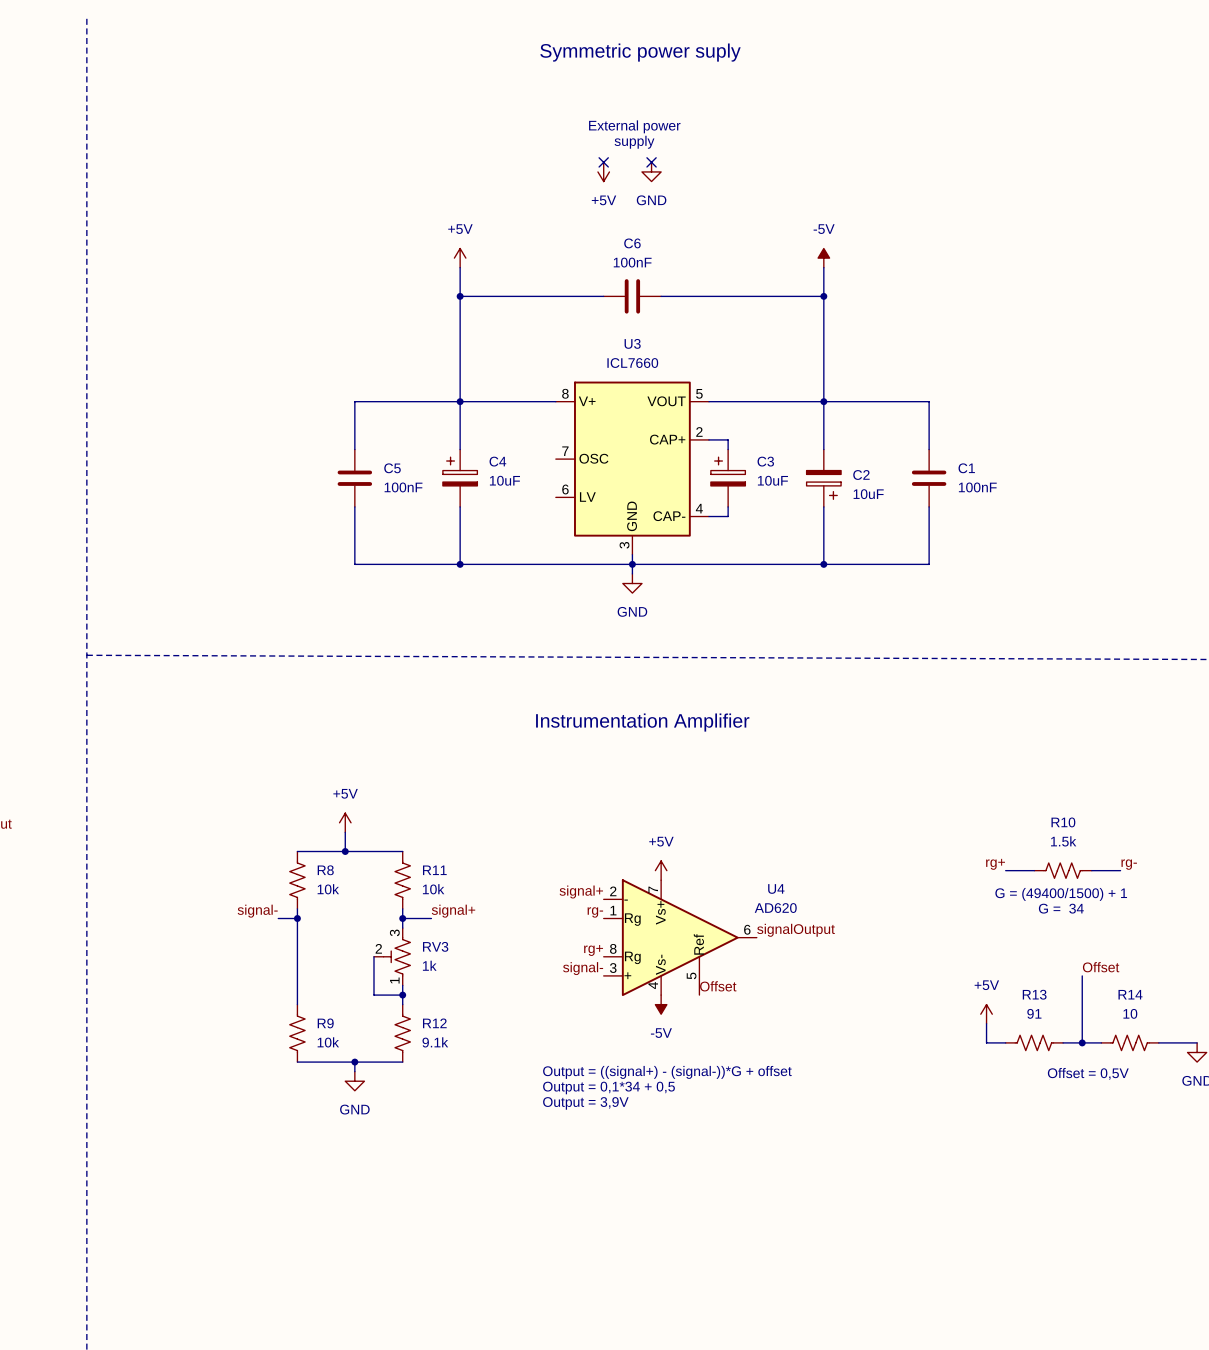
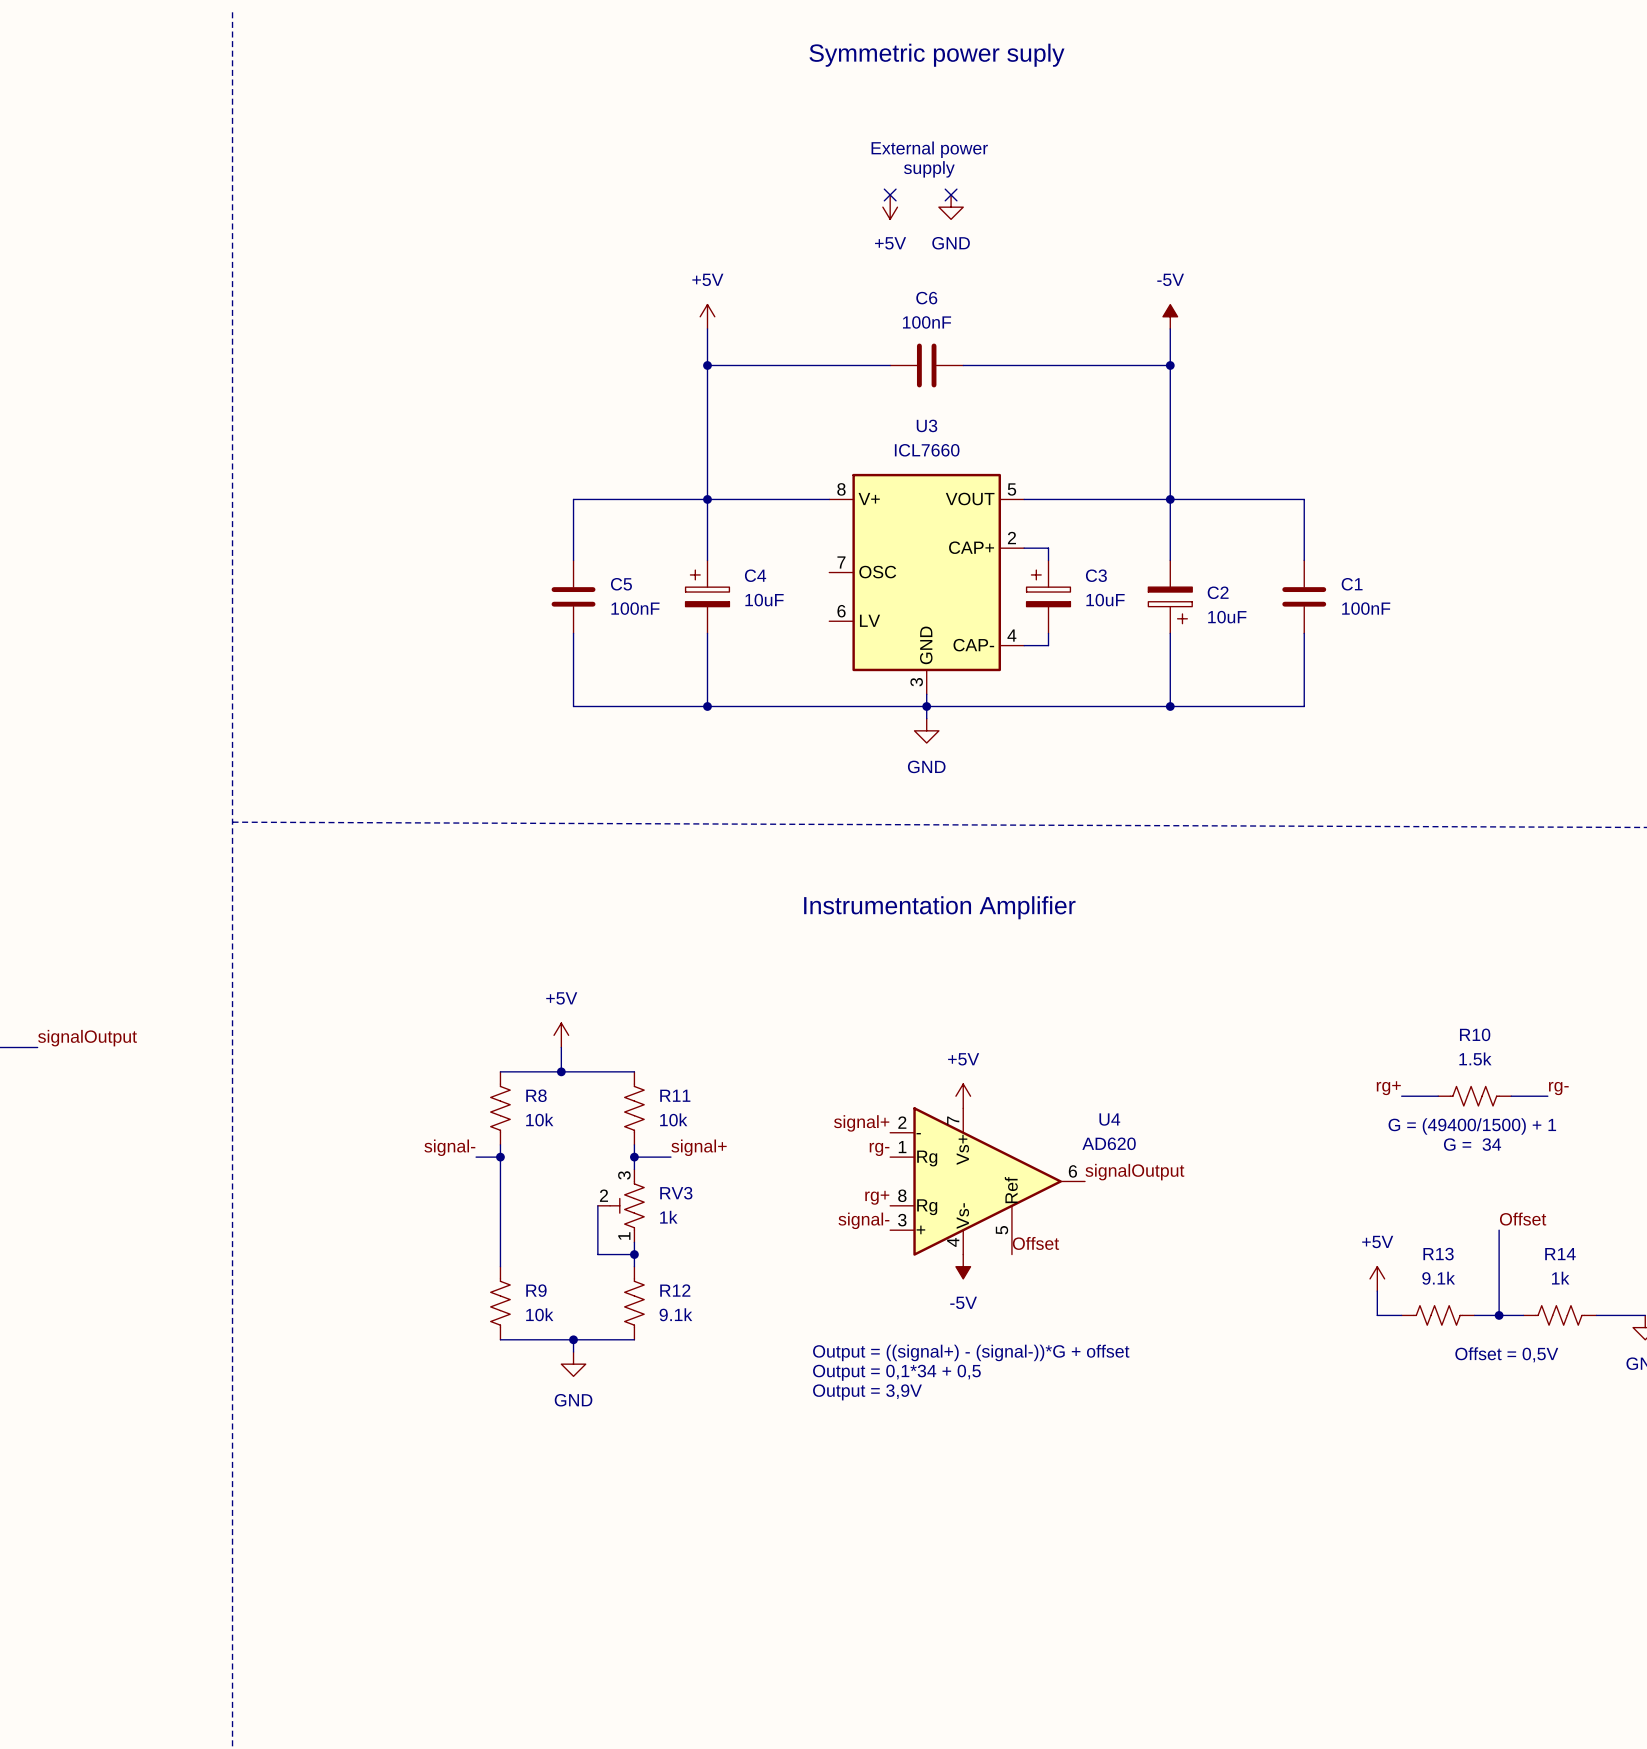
R13 value: 91 (1034, 1013) -> 9.1k (1438, 1278)
R14 value: 10 (1130, 1013) -> 1k (1560, 1278)

